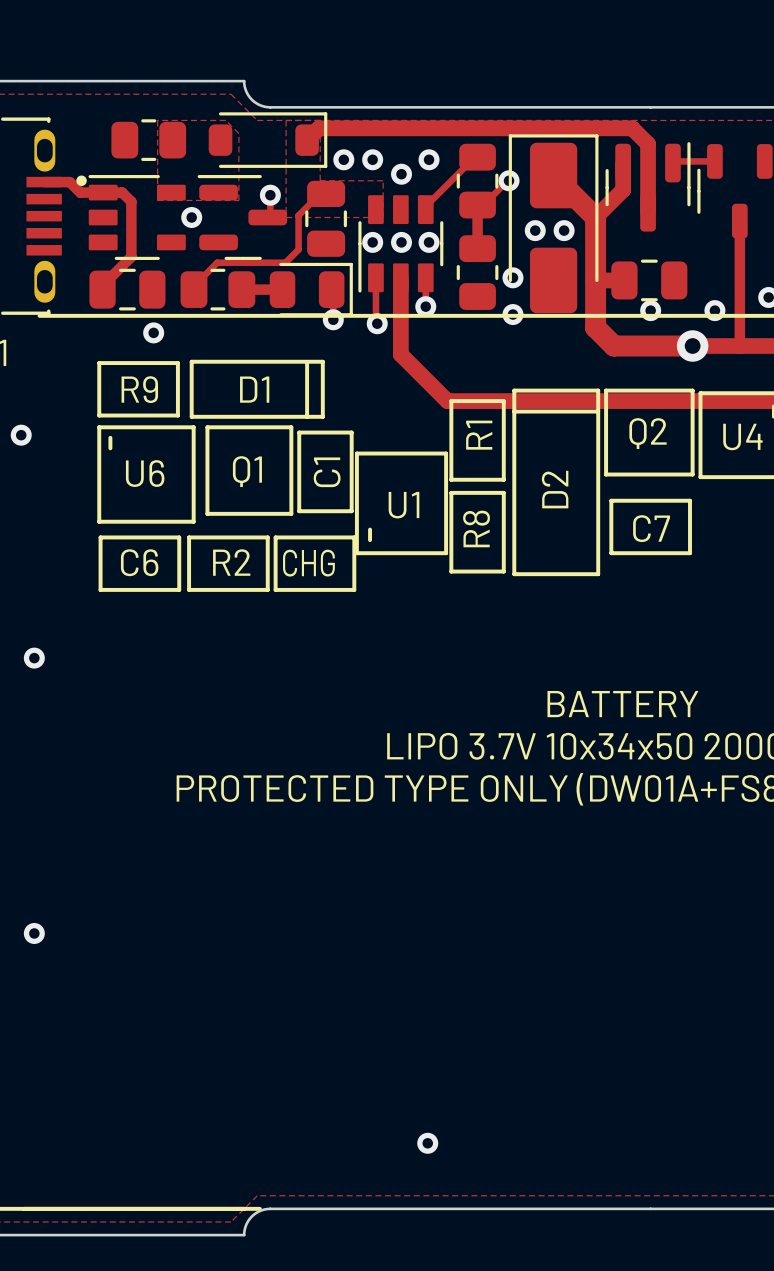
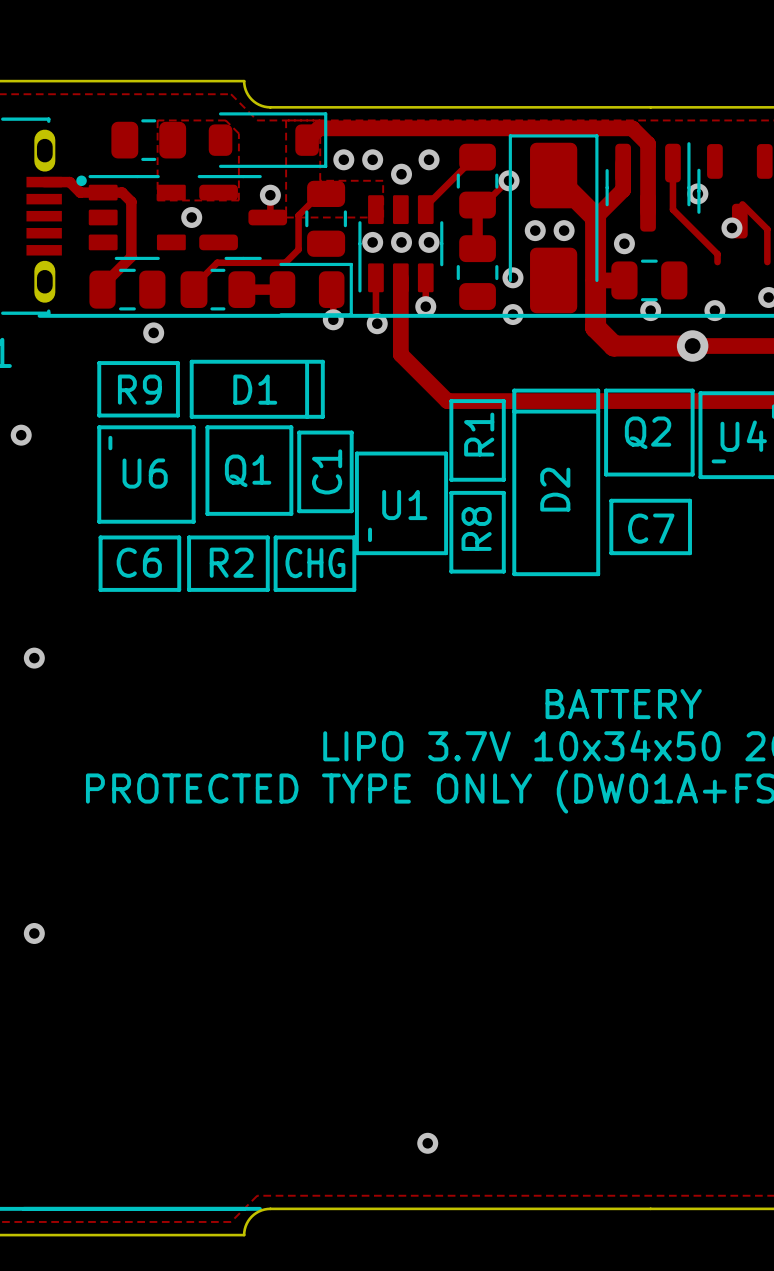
track: (714, 161) (674, 161) (672, 163) -> (717, 262) (717, 254) (672, 209) (672, 163)
via: none -> (697, 193)
track: none -> (742, 204) (767, 229) (767, 262)
track: (739, 221) (739, 346) -> none
via: none -> (731, 227)
via: none -> (624, 243)
line: none -> (713, 461) (724, 461)

